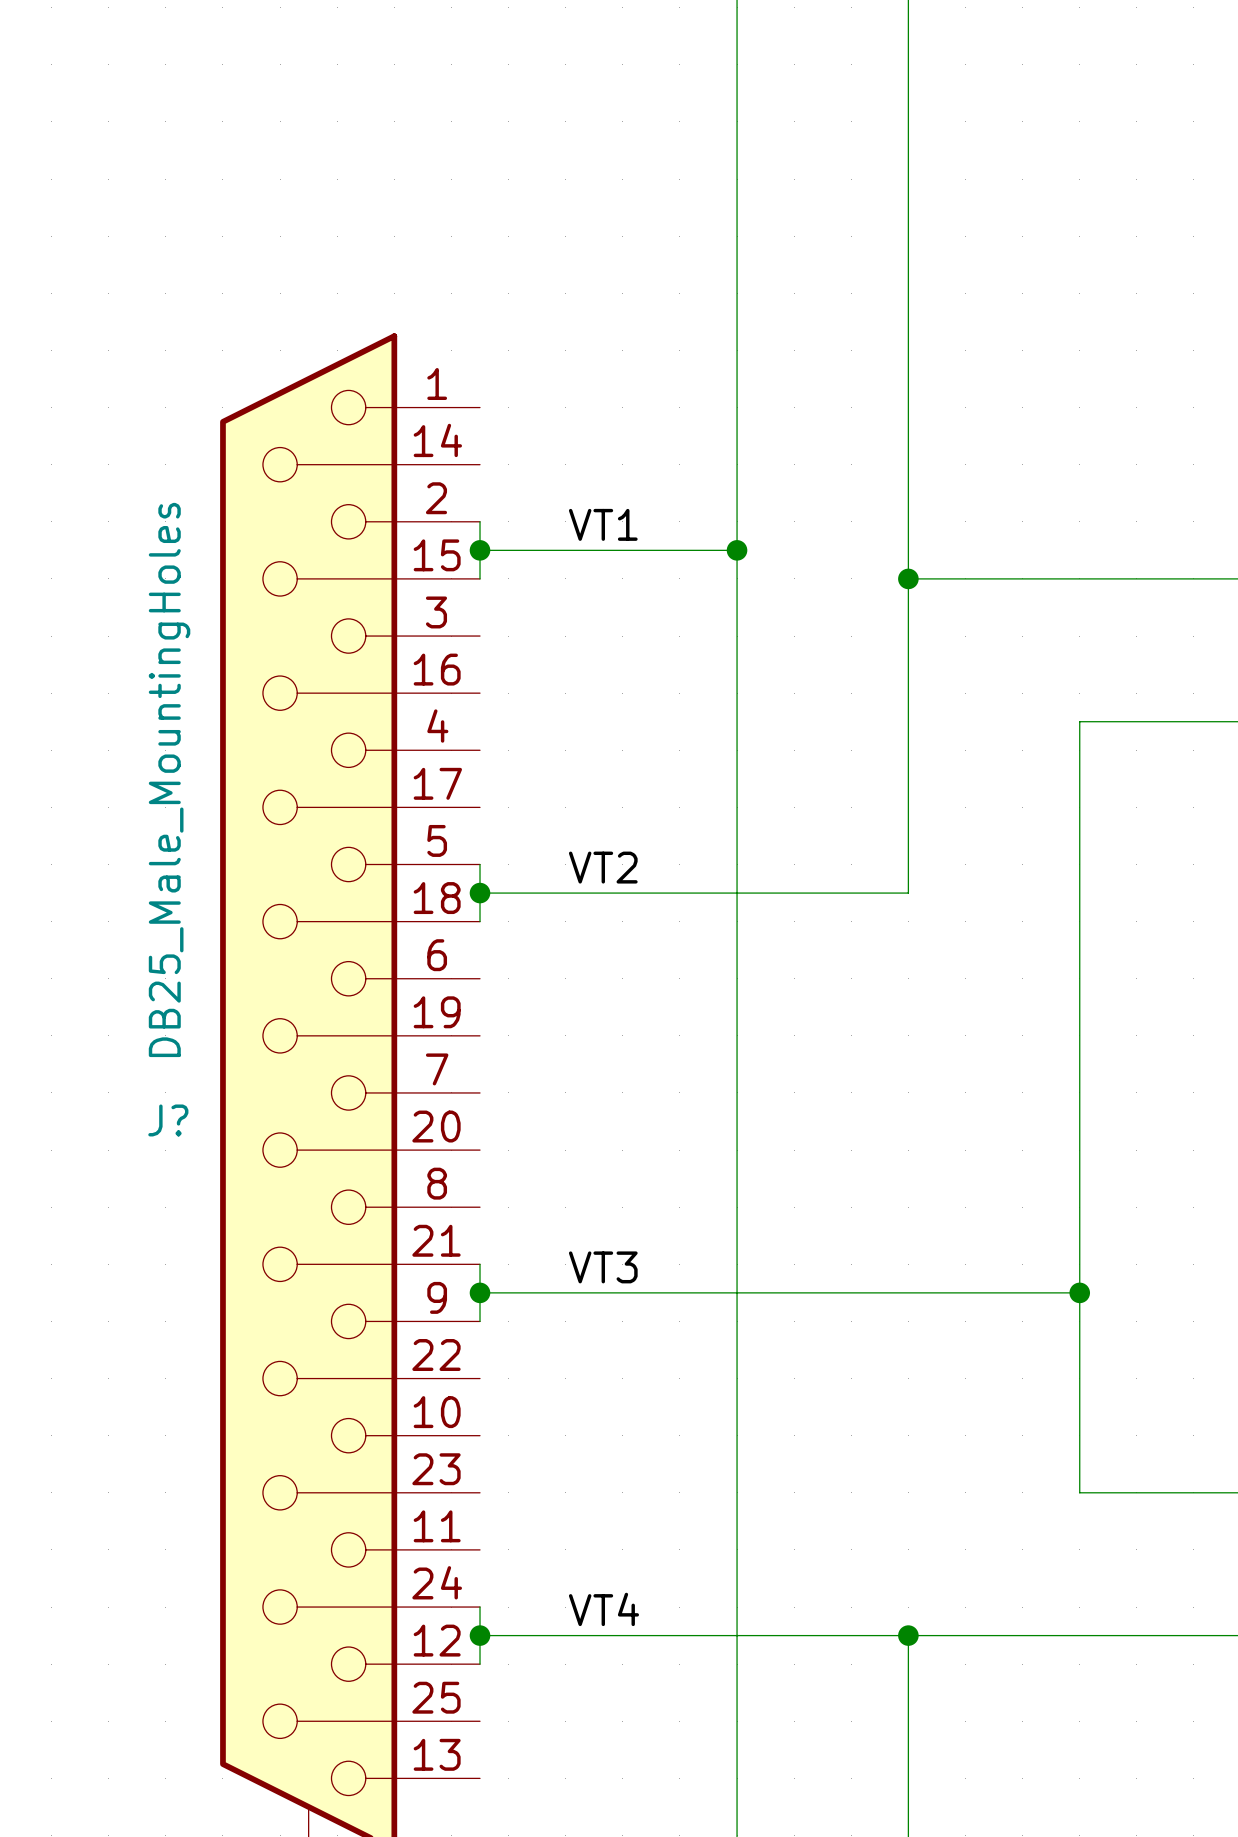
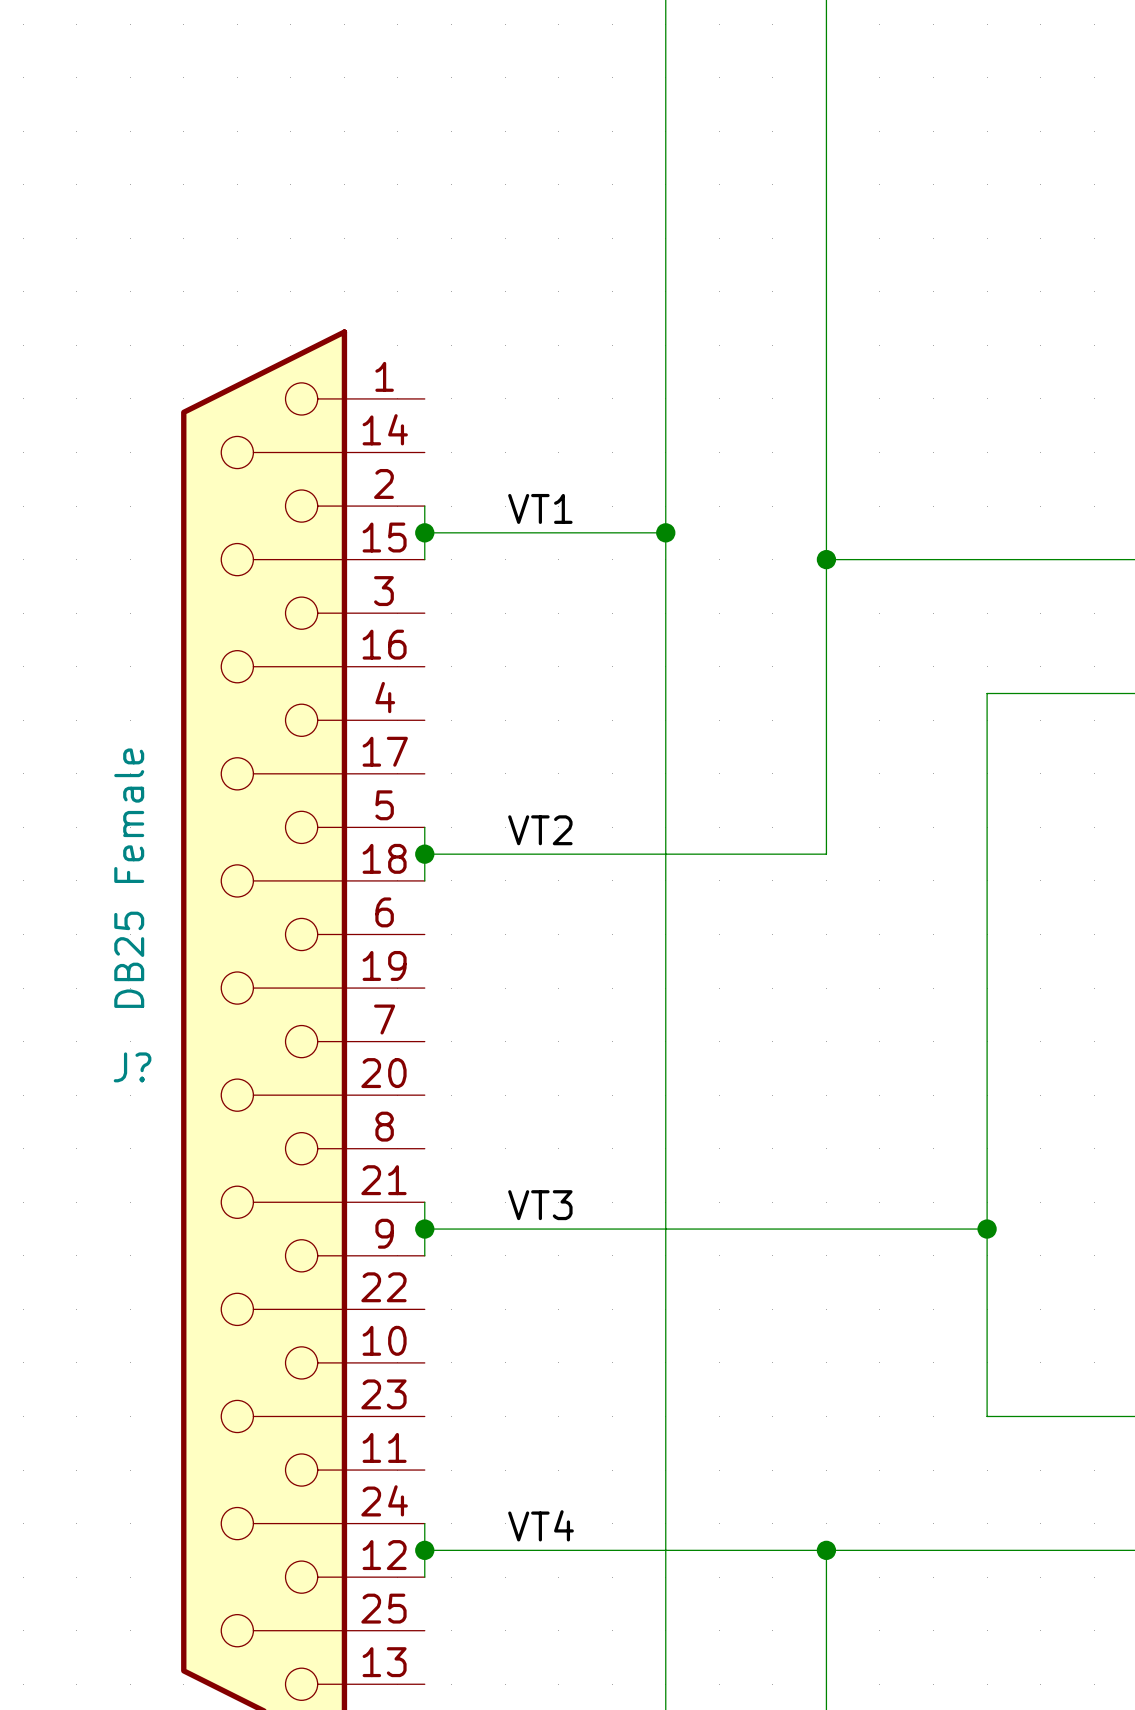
J? value: DB25_Male_MountingHoles (169, 779) -> DB25 Female (129, 878)

